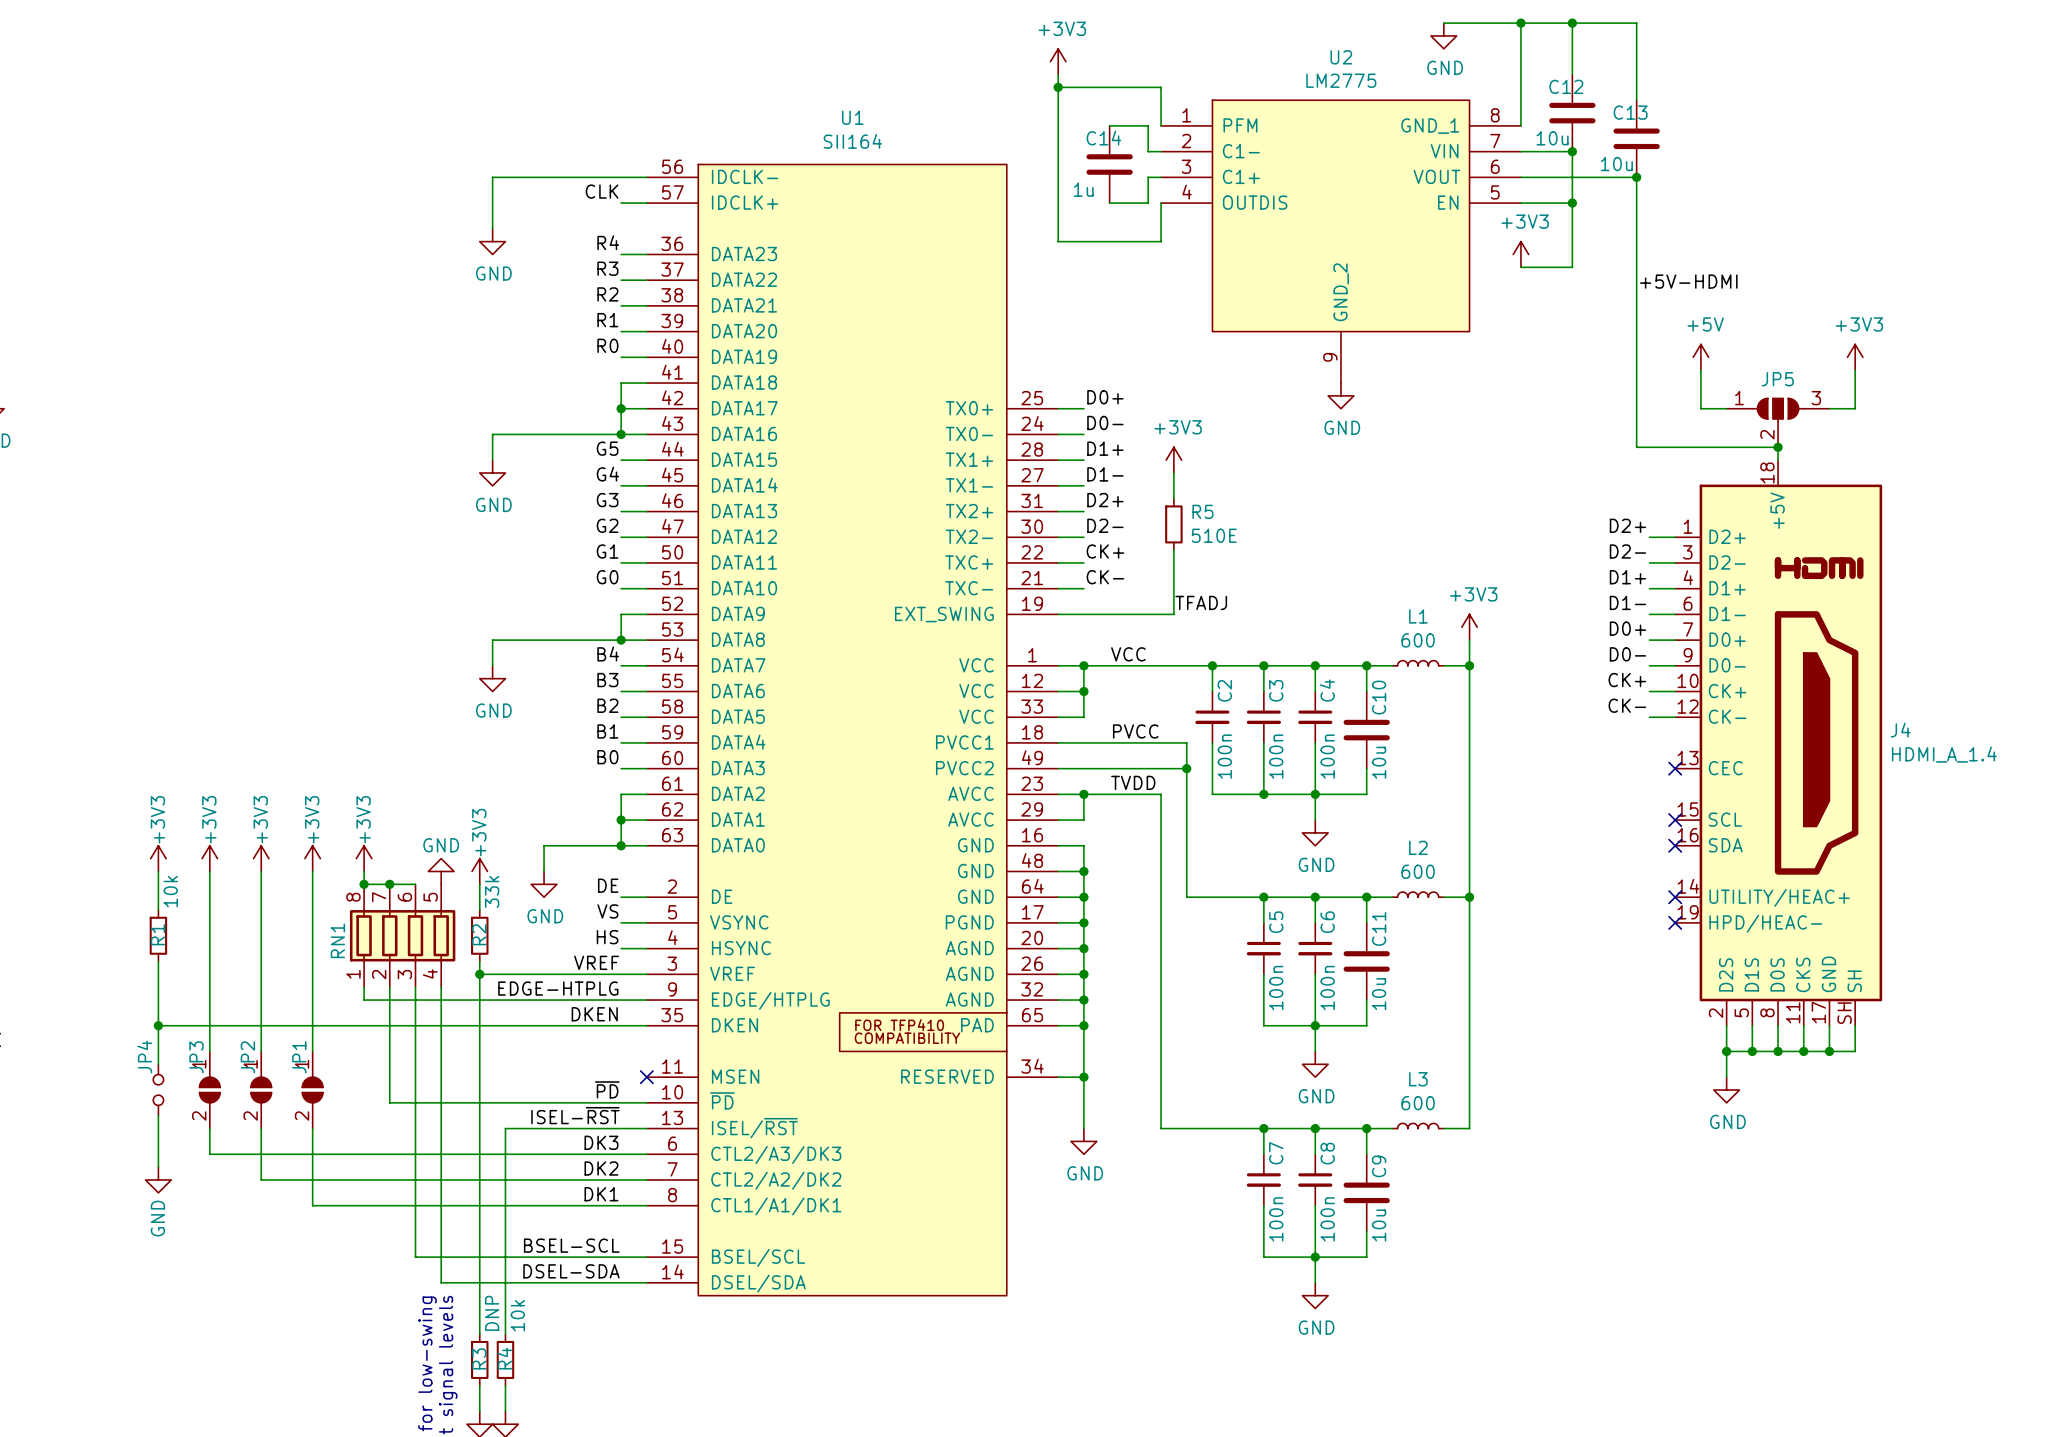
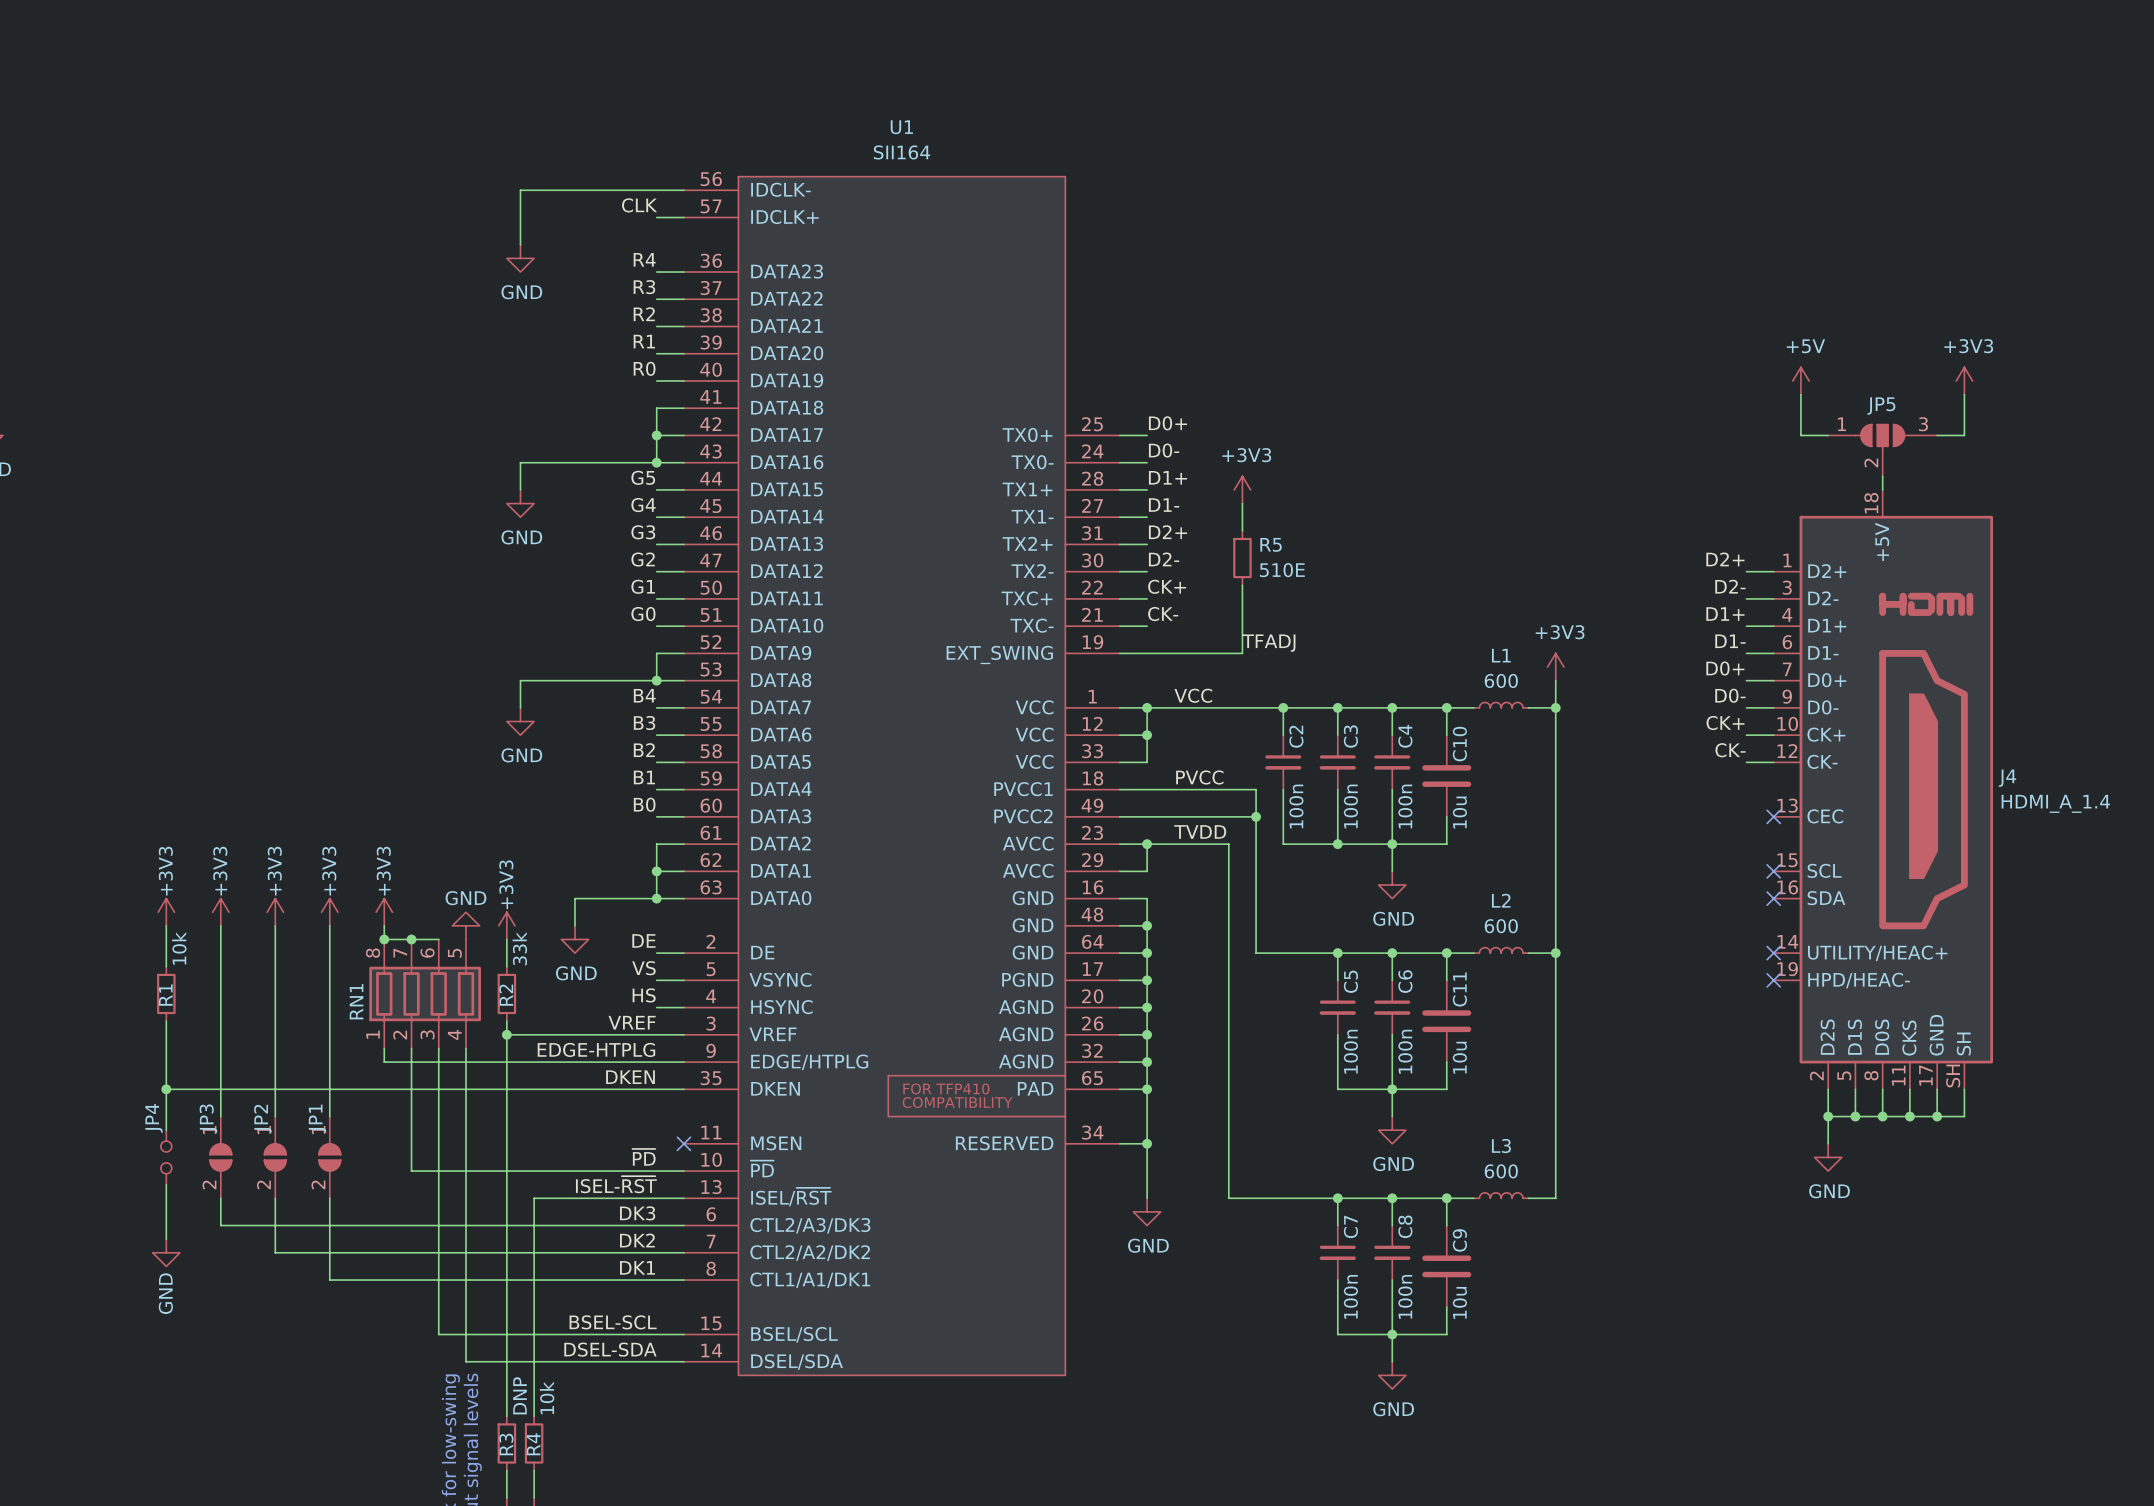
wire: (1443, 23) (1636, 23) (1636, 100) -> none
wire: (1520, 23) (1520, 125) -> none
junction: (1520, 23) -> none
wire: (1572, 23) (1572, 74) -> none
junction: (1572, 23) -> none
power symbol: GND (1443, 35) -> none
power symbol: +3V3 (1058, 61) -> none
wire: (1058, 74) (1058, 241) (1161, 241) (1161, 203) -> none
wire: (1058, 87) (1161, 87) (1161, 125) -> none
junction: (1058, 87) -> none
C12: 10u (1572, 113) -> none
wire: (1109, 125) (1148, 125) (1148, 151) (1161, 151) -> none
C13: 10u (1636, 138) -> none
wire: (1520, 151) (1572, 151) (1572, 267) (1520, 267) -> none
junction: (1572, 151) -> none
C14: 1u (1109, 164) -> none
wire: (1161, 177) (1148, 177) (1148, 203) (1109, 203) -> none
wire: (1520, 177) (1636, 177) (1636, 447) (1778, 447) -> none
junction: (1636, 177) -> none
wire: (1520, 203) (1572, 203) -> none
junction: (1572, 203) -> none
U2: LM2775 (1341, 241) -> none
power symbol: +3V3 (1520, 254) -> none
label: +5V-HDMI (1688, 281) -> none
power symbol: GND (1341, 395) -> none
junction: (1778, 447) -> none

